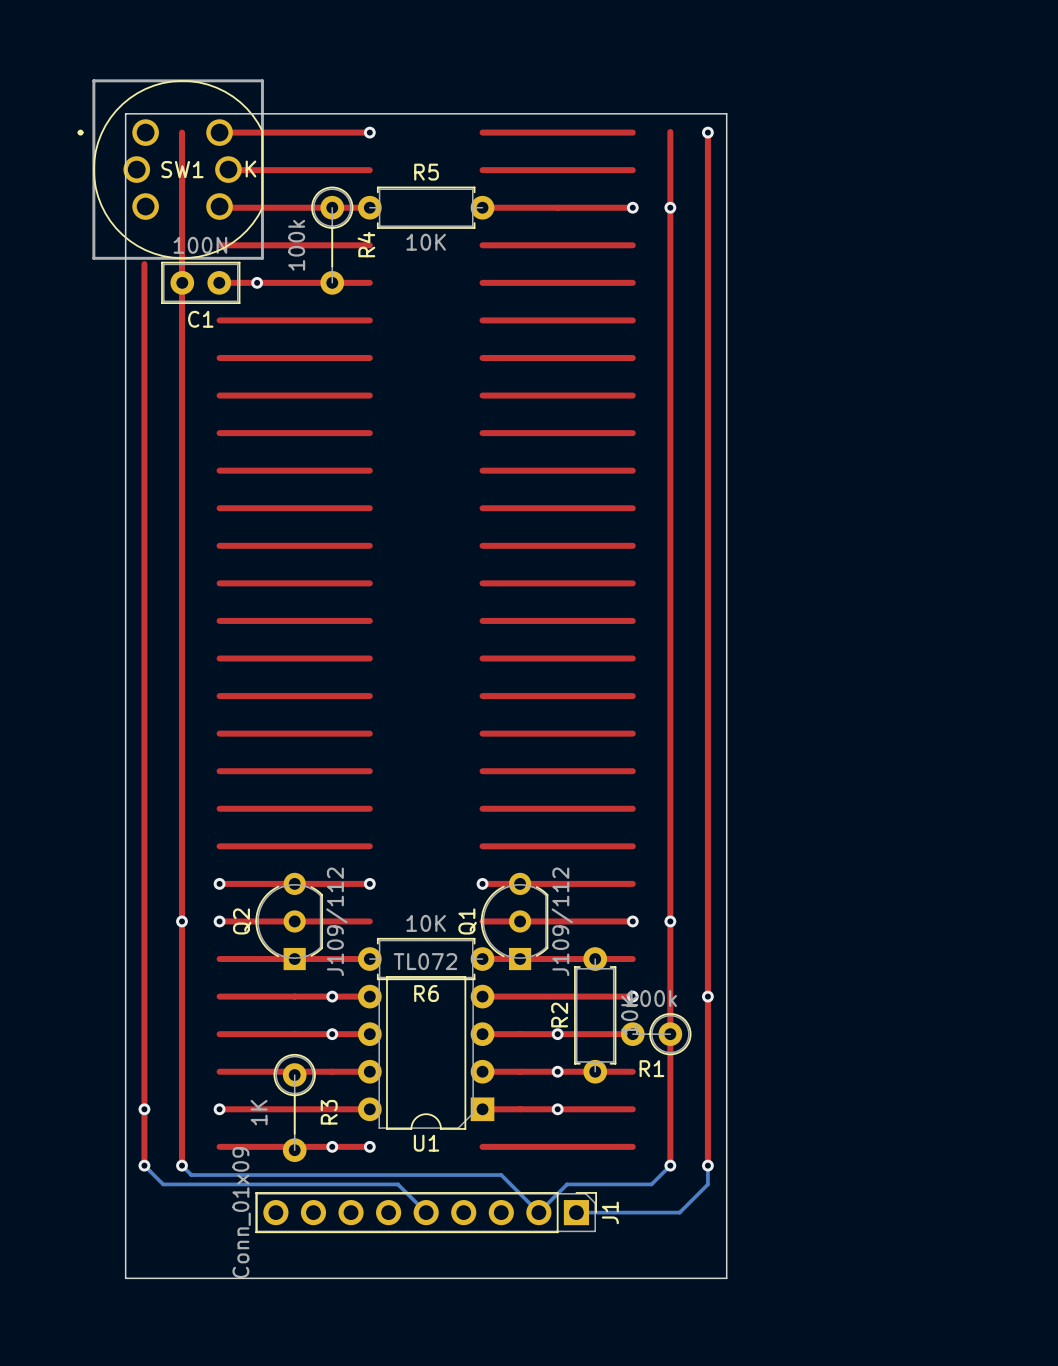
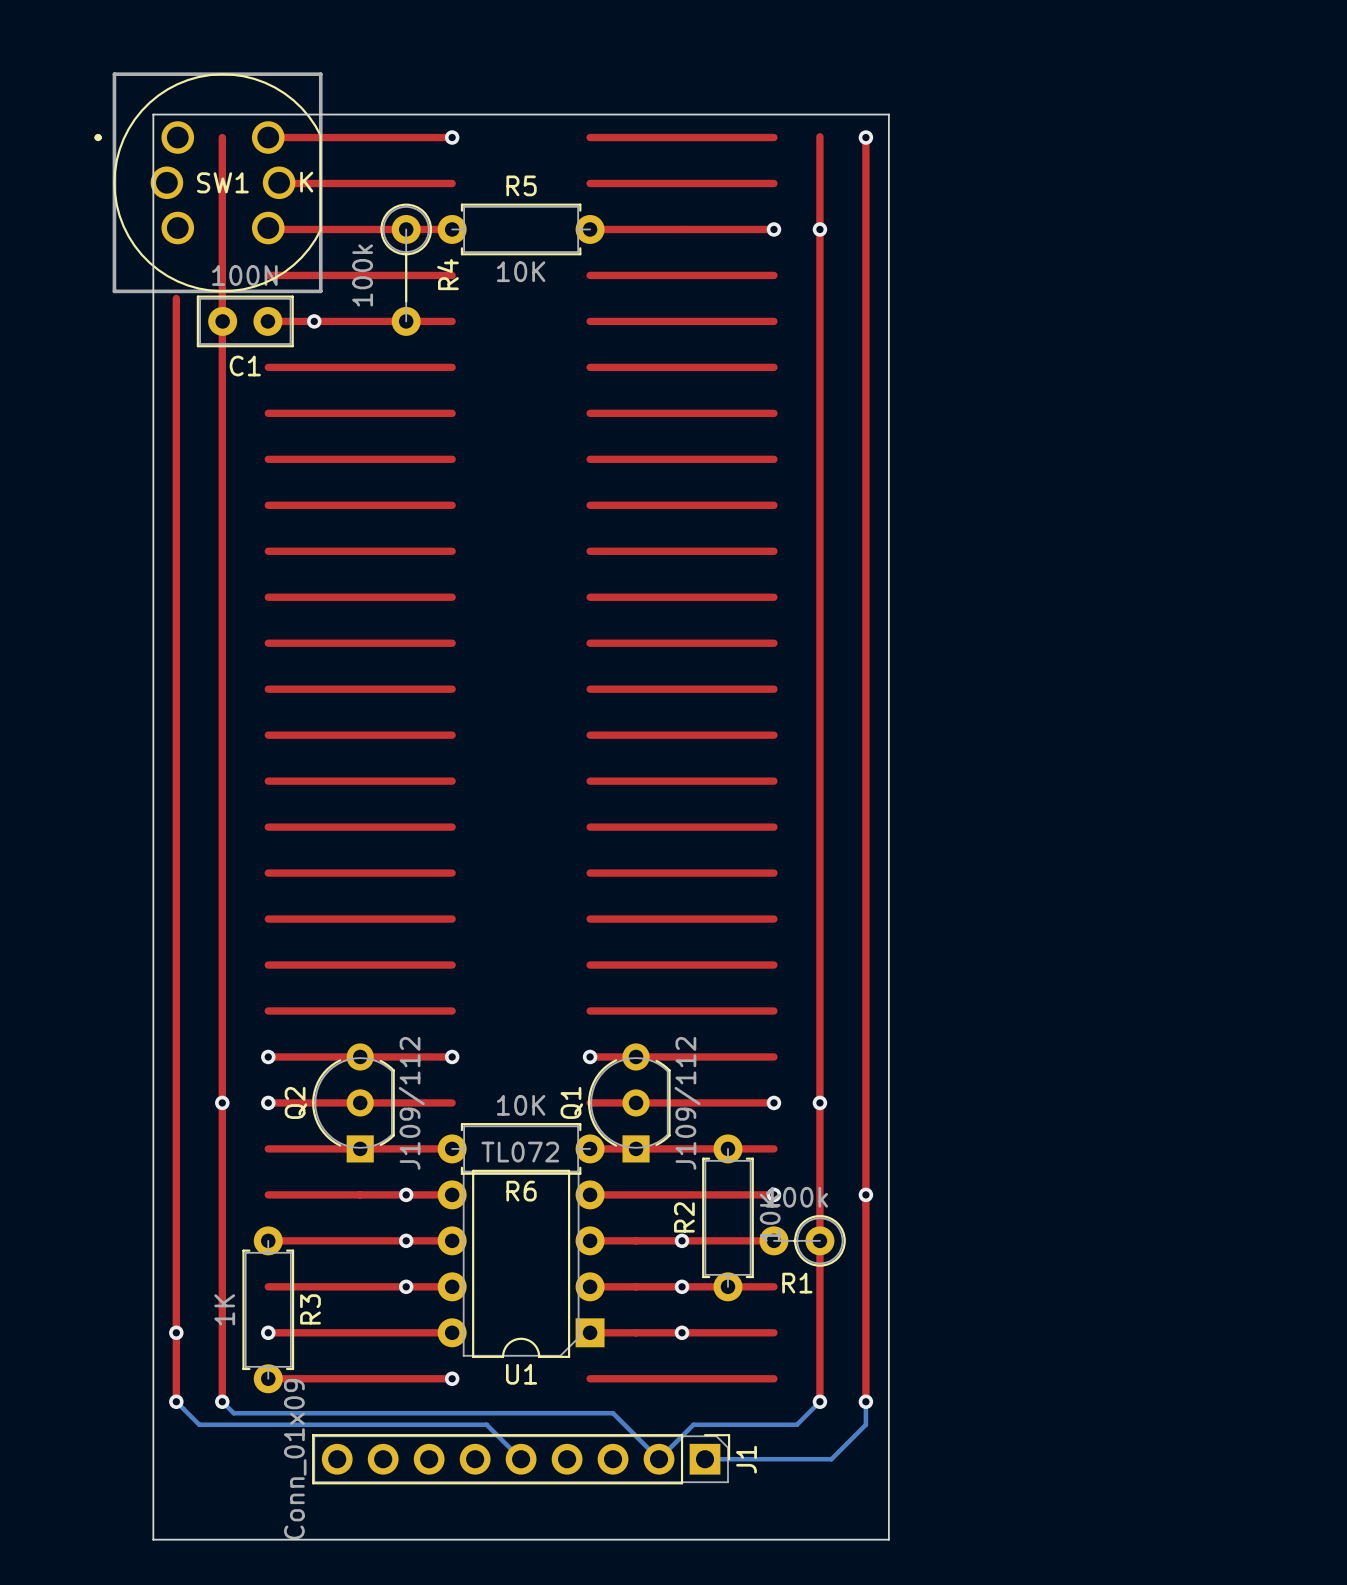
R3 footprint: [273, 1053, 316, 1163] -> [242, 1226, 295, 1394]
via position: (332, 1146) -> (406, 1286)

